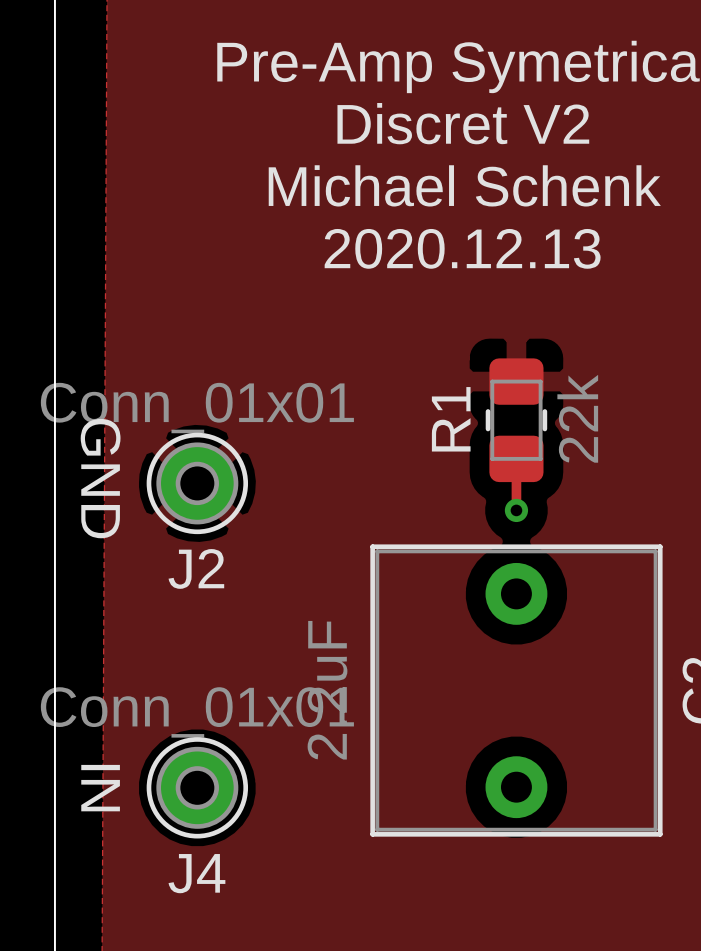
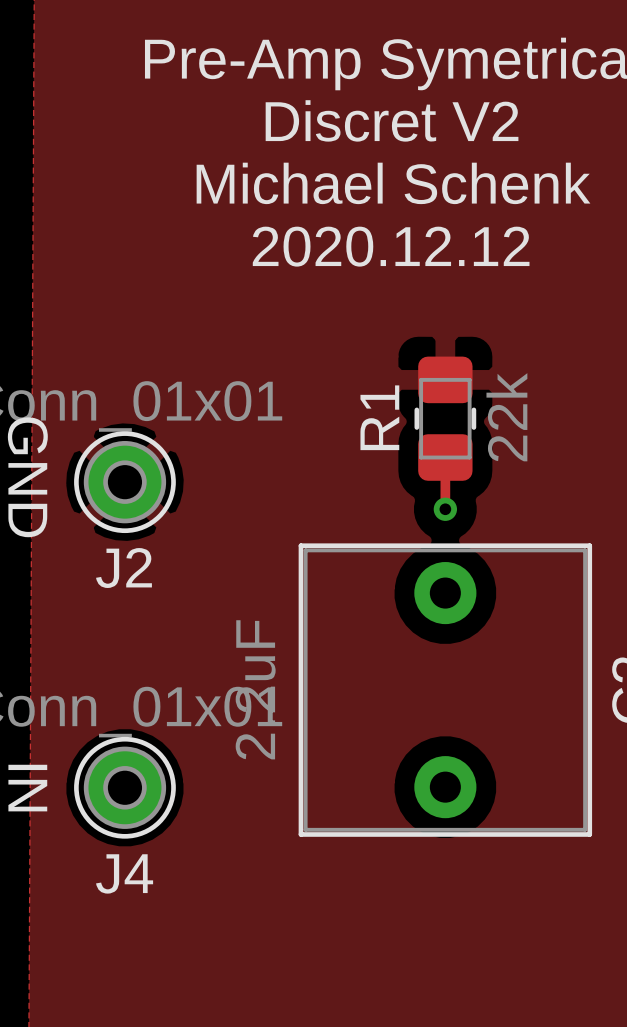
text: 2020.12.13 (462, 248) -> 2020.12.12 (391, 246)

